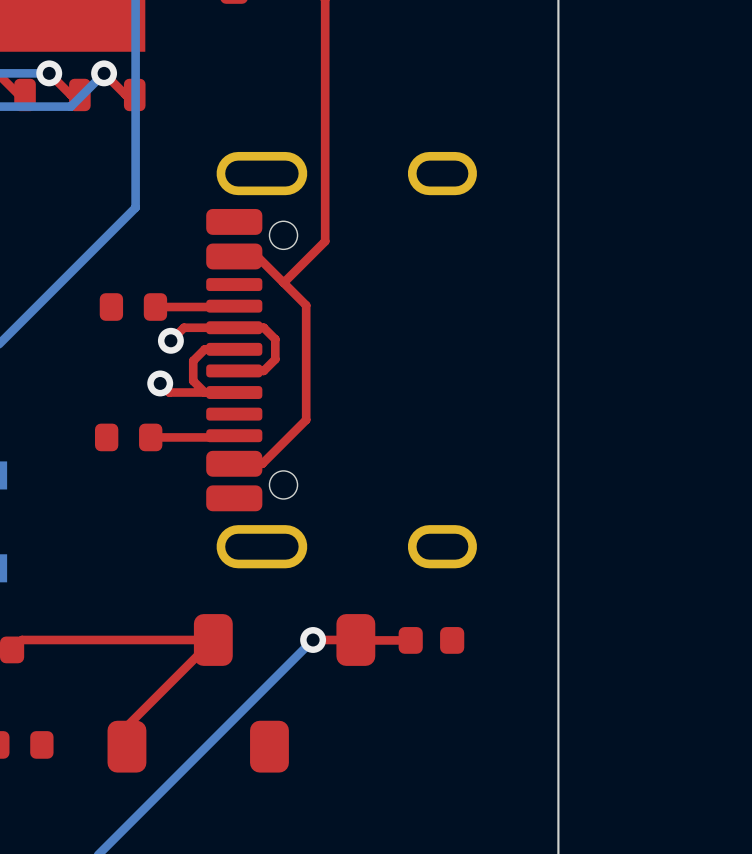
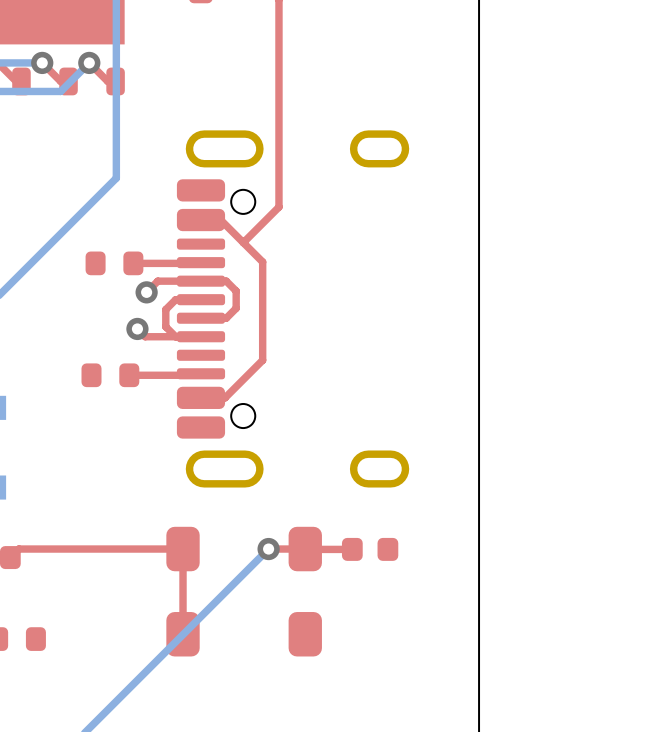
top track: (213, 639) (126, 726) (126, 746) -> (183, 549) (183, 634)
part position: (198, 746) -> (244, 634)

